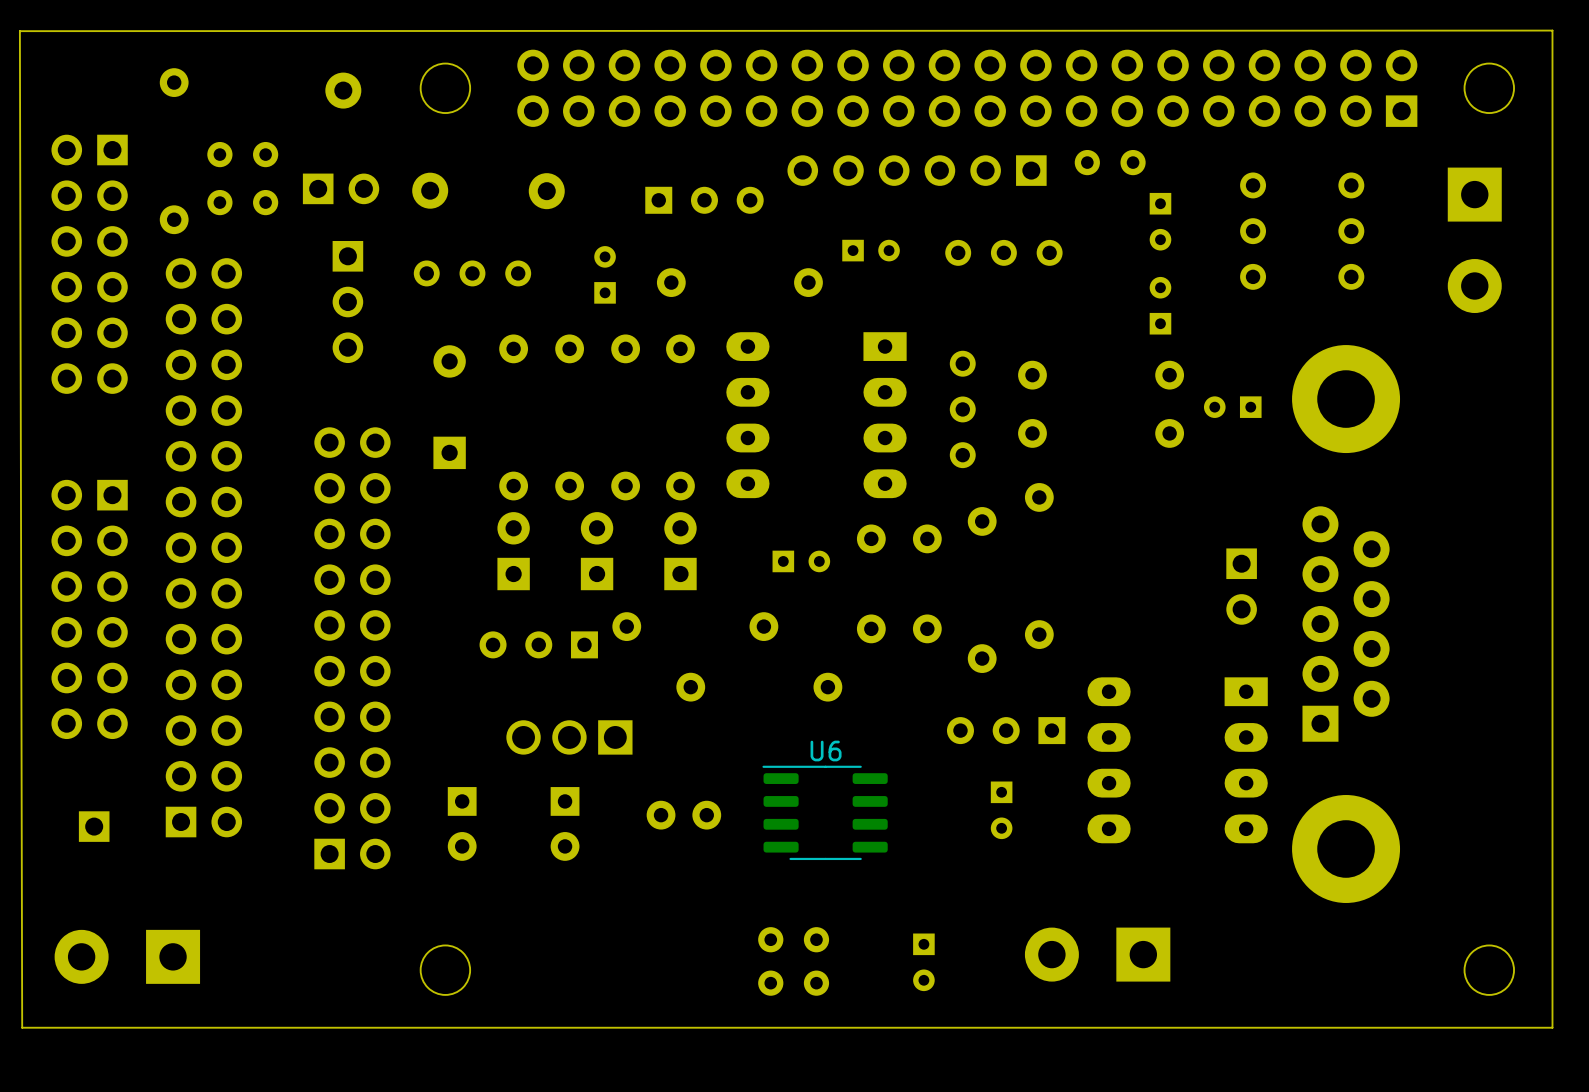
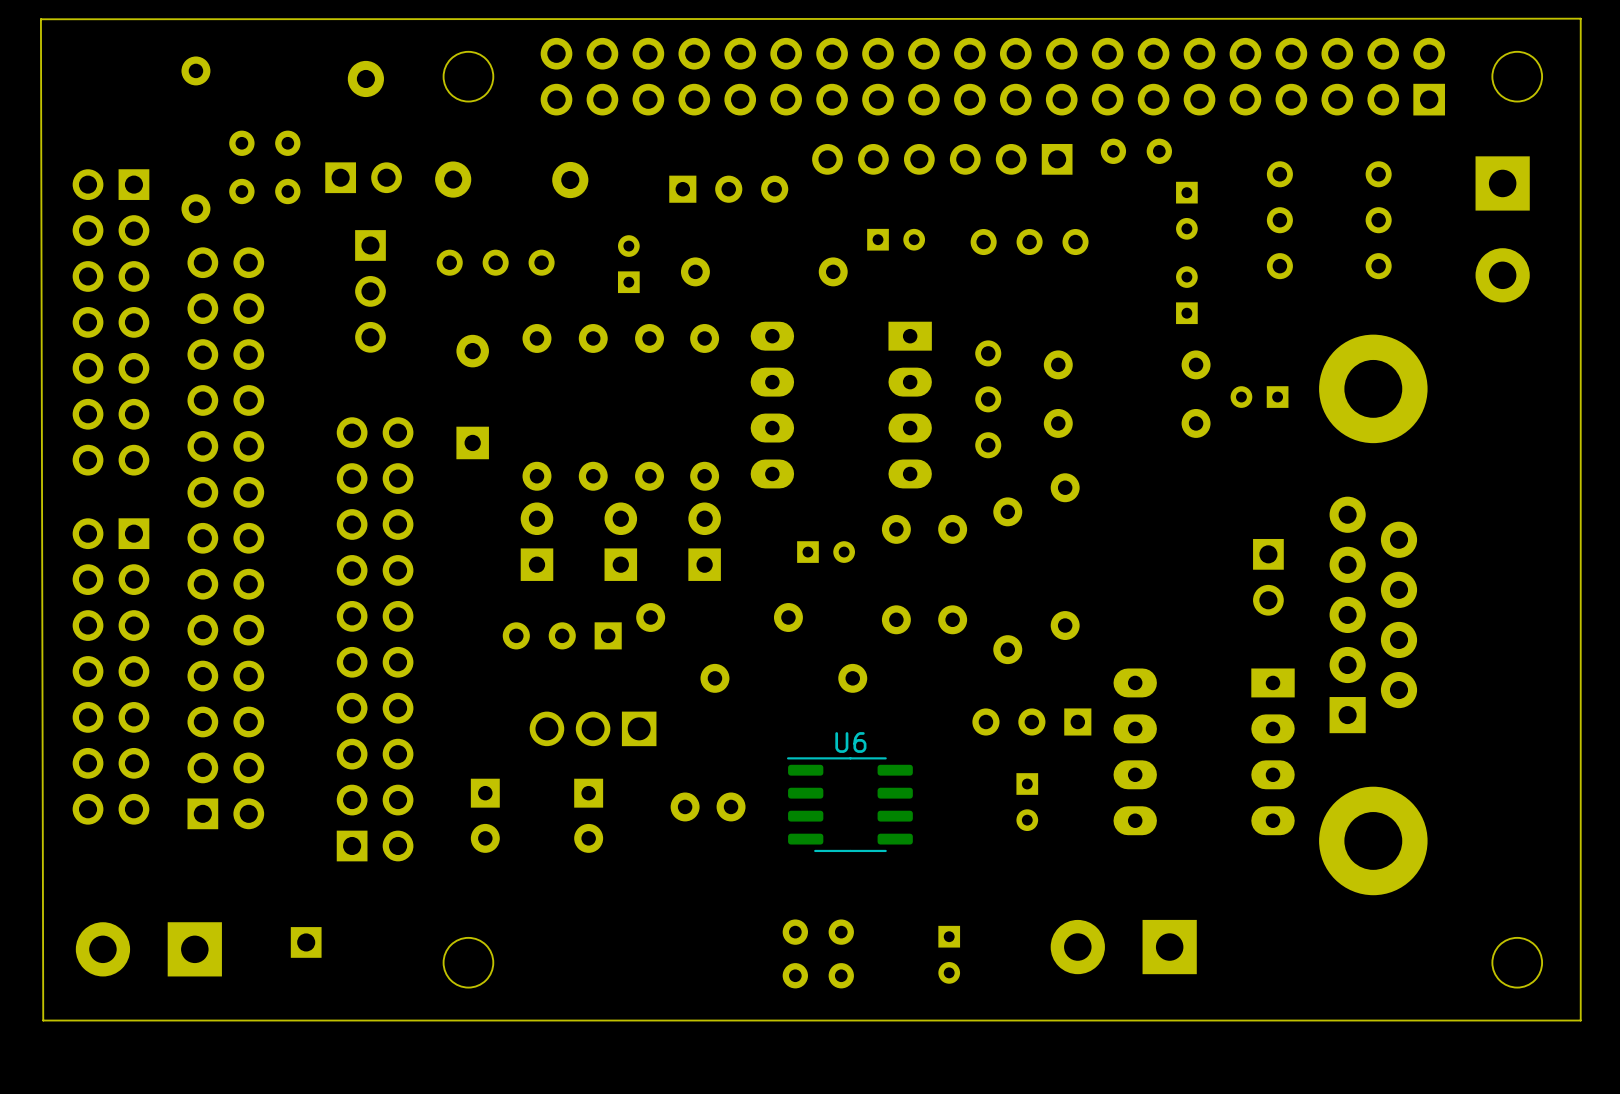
part: (89, 264) -> none
part: none -> (110, 322)
part: (89, 609) -> none
part: none -> (110, 671)
part position: (94, 826) -> (306, 942)

